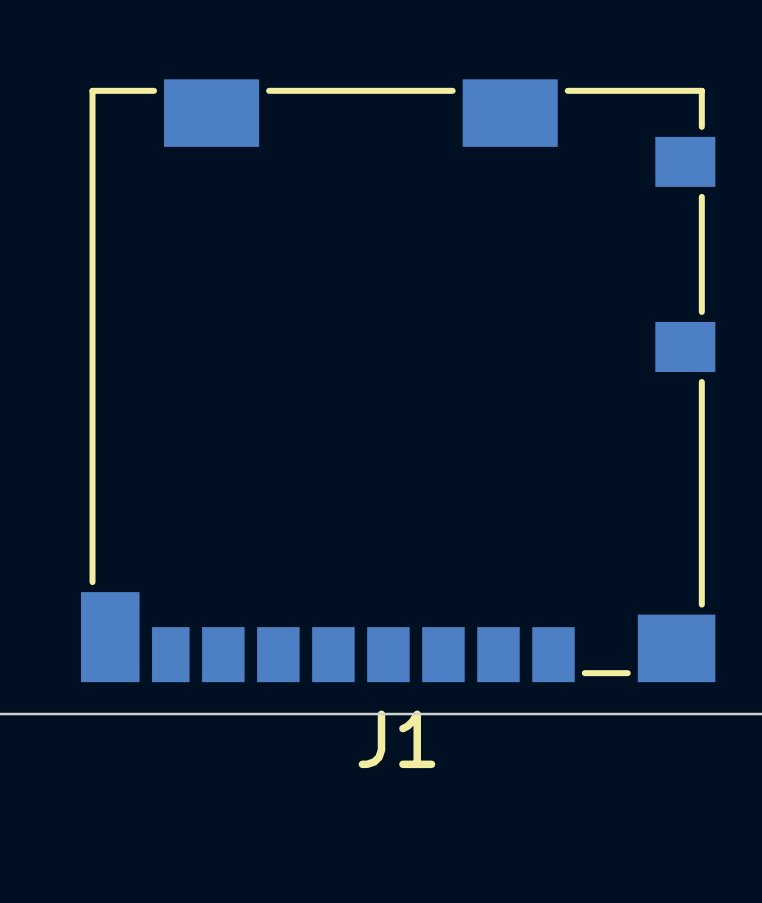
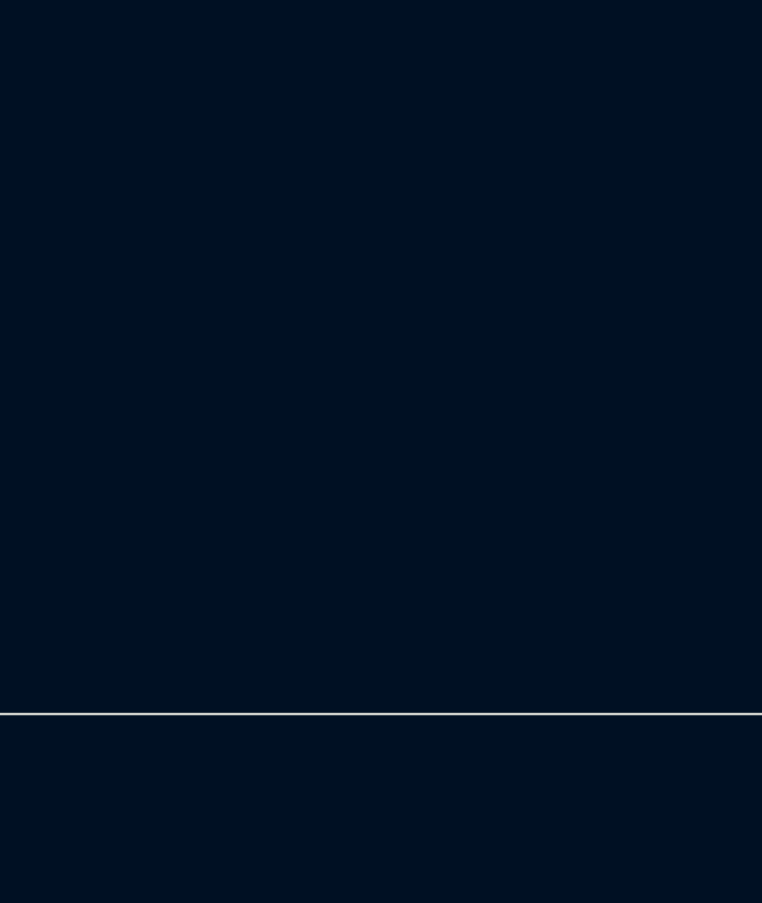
J1: (398, 380) -> none

